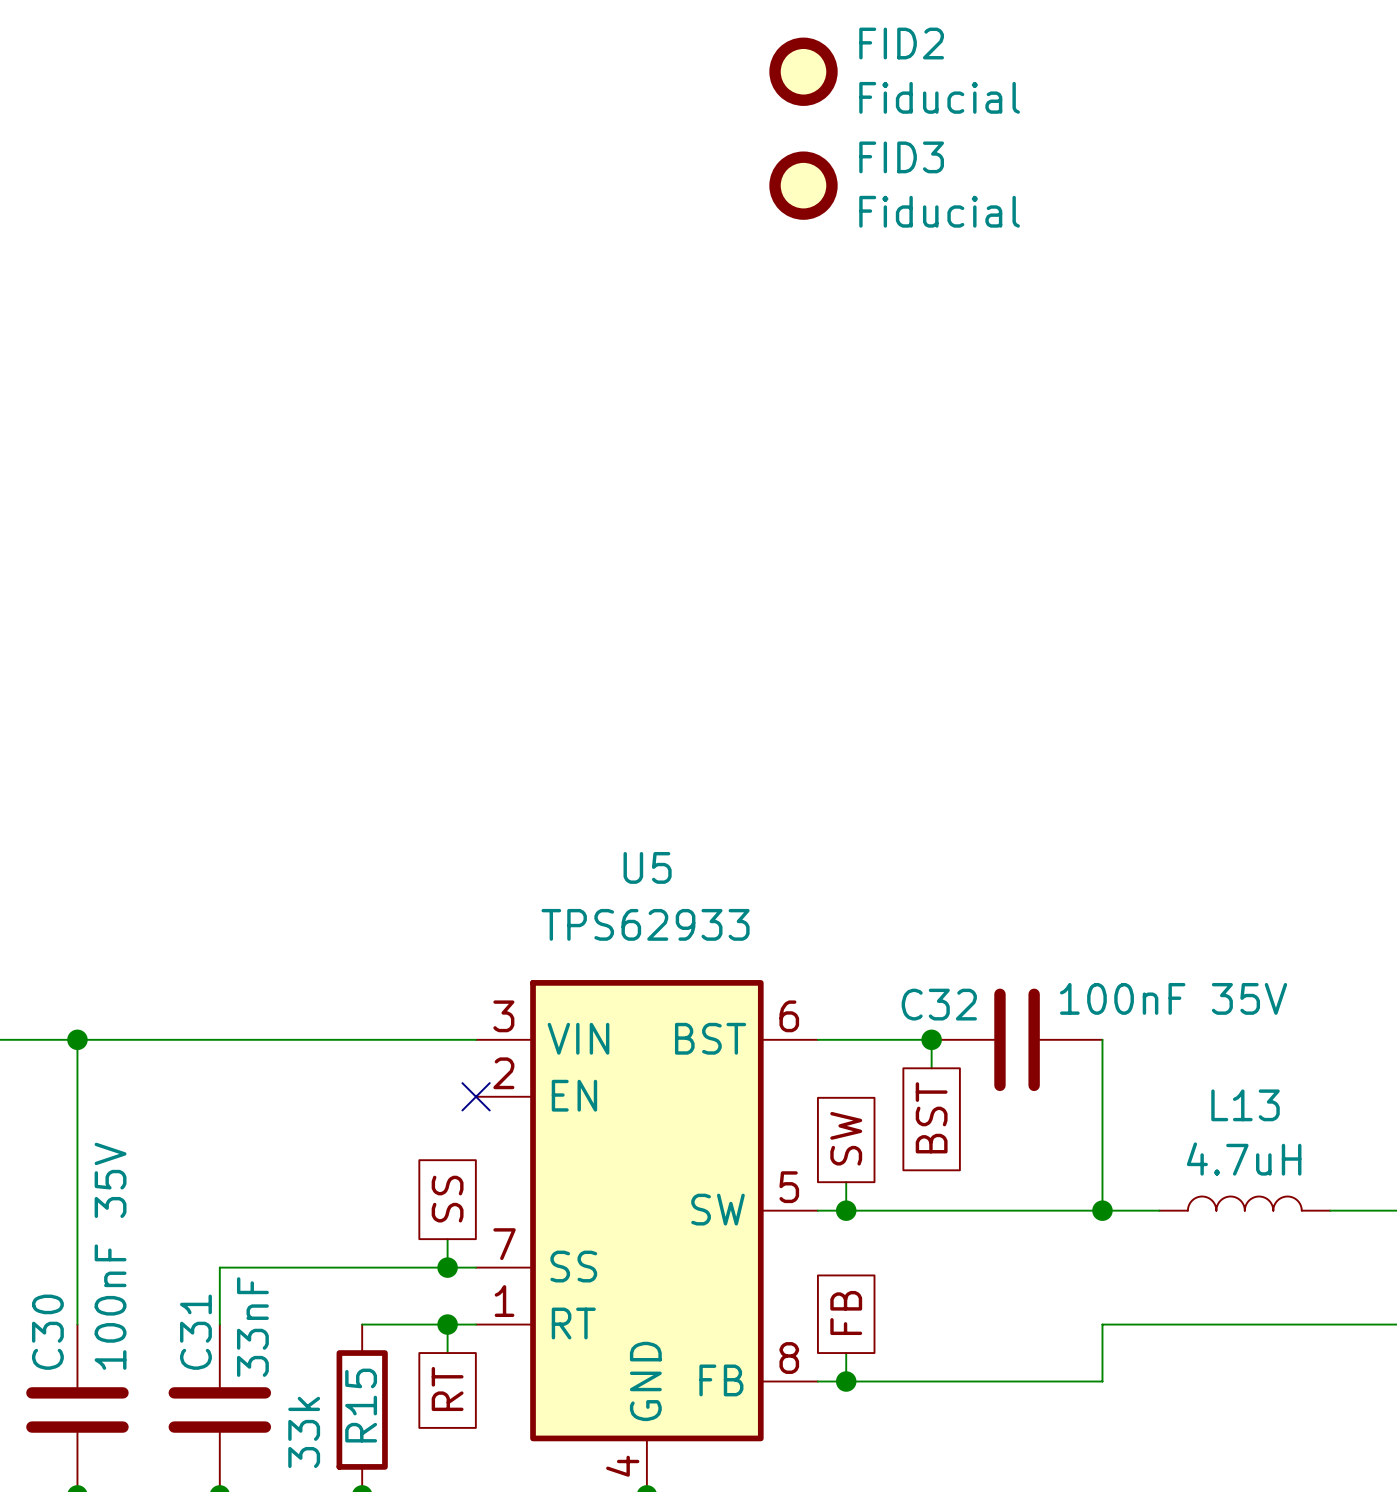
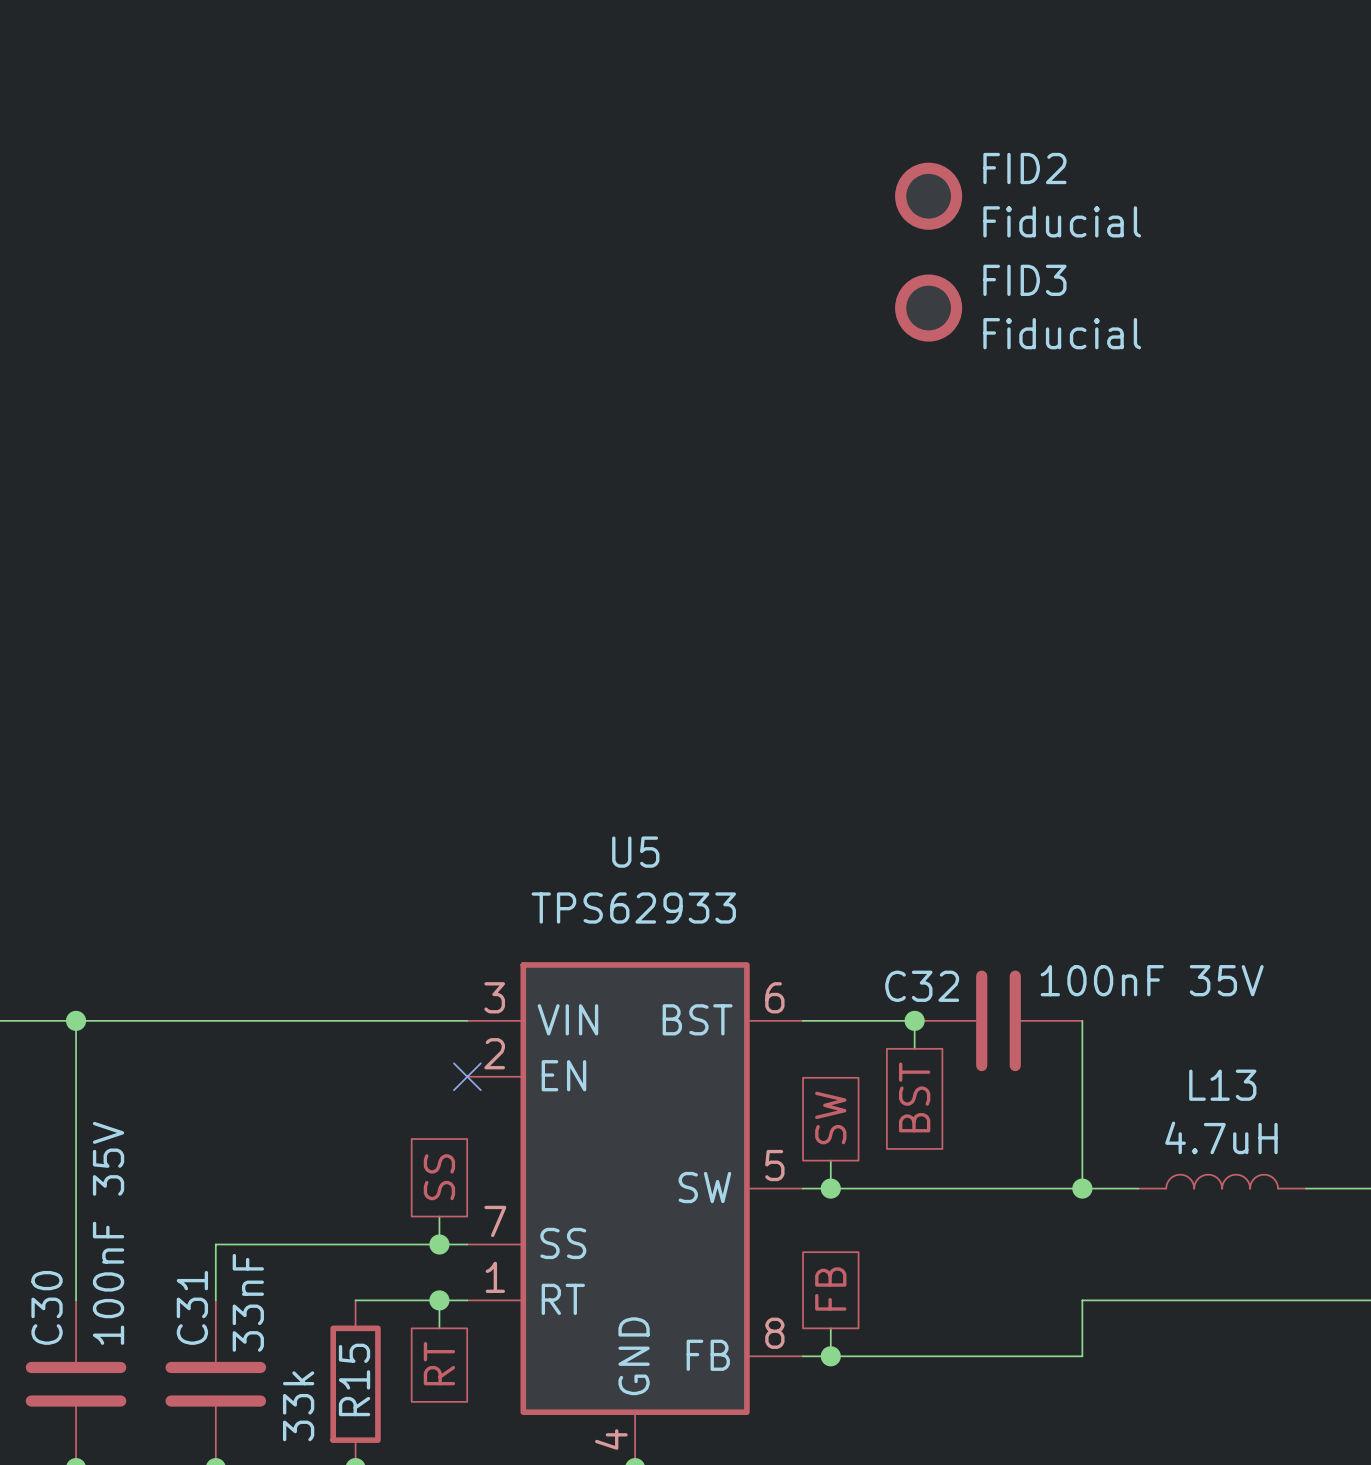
FID2 position: (803, 71) -> (928, 196)
FID3 position: (803, 185) -> (928, 308)

